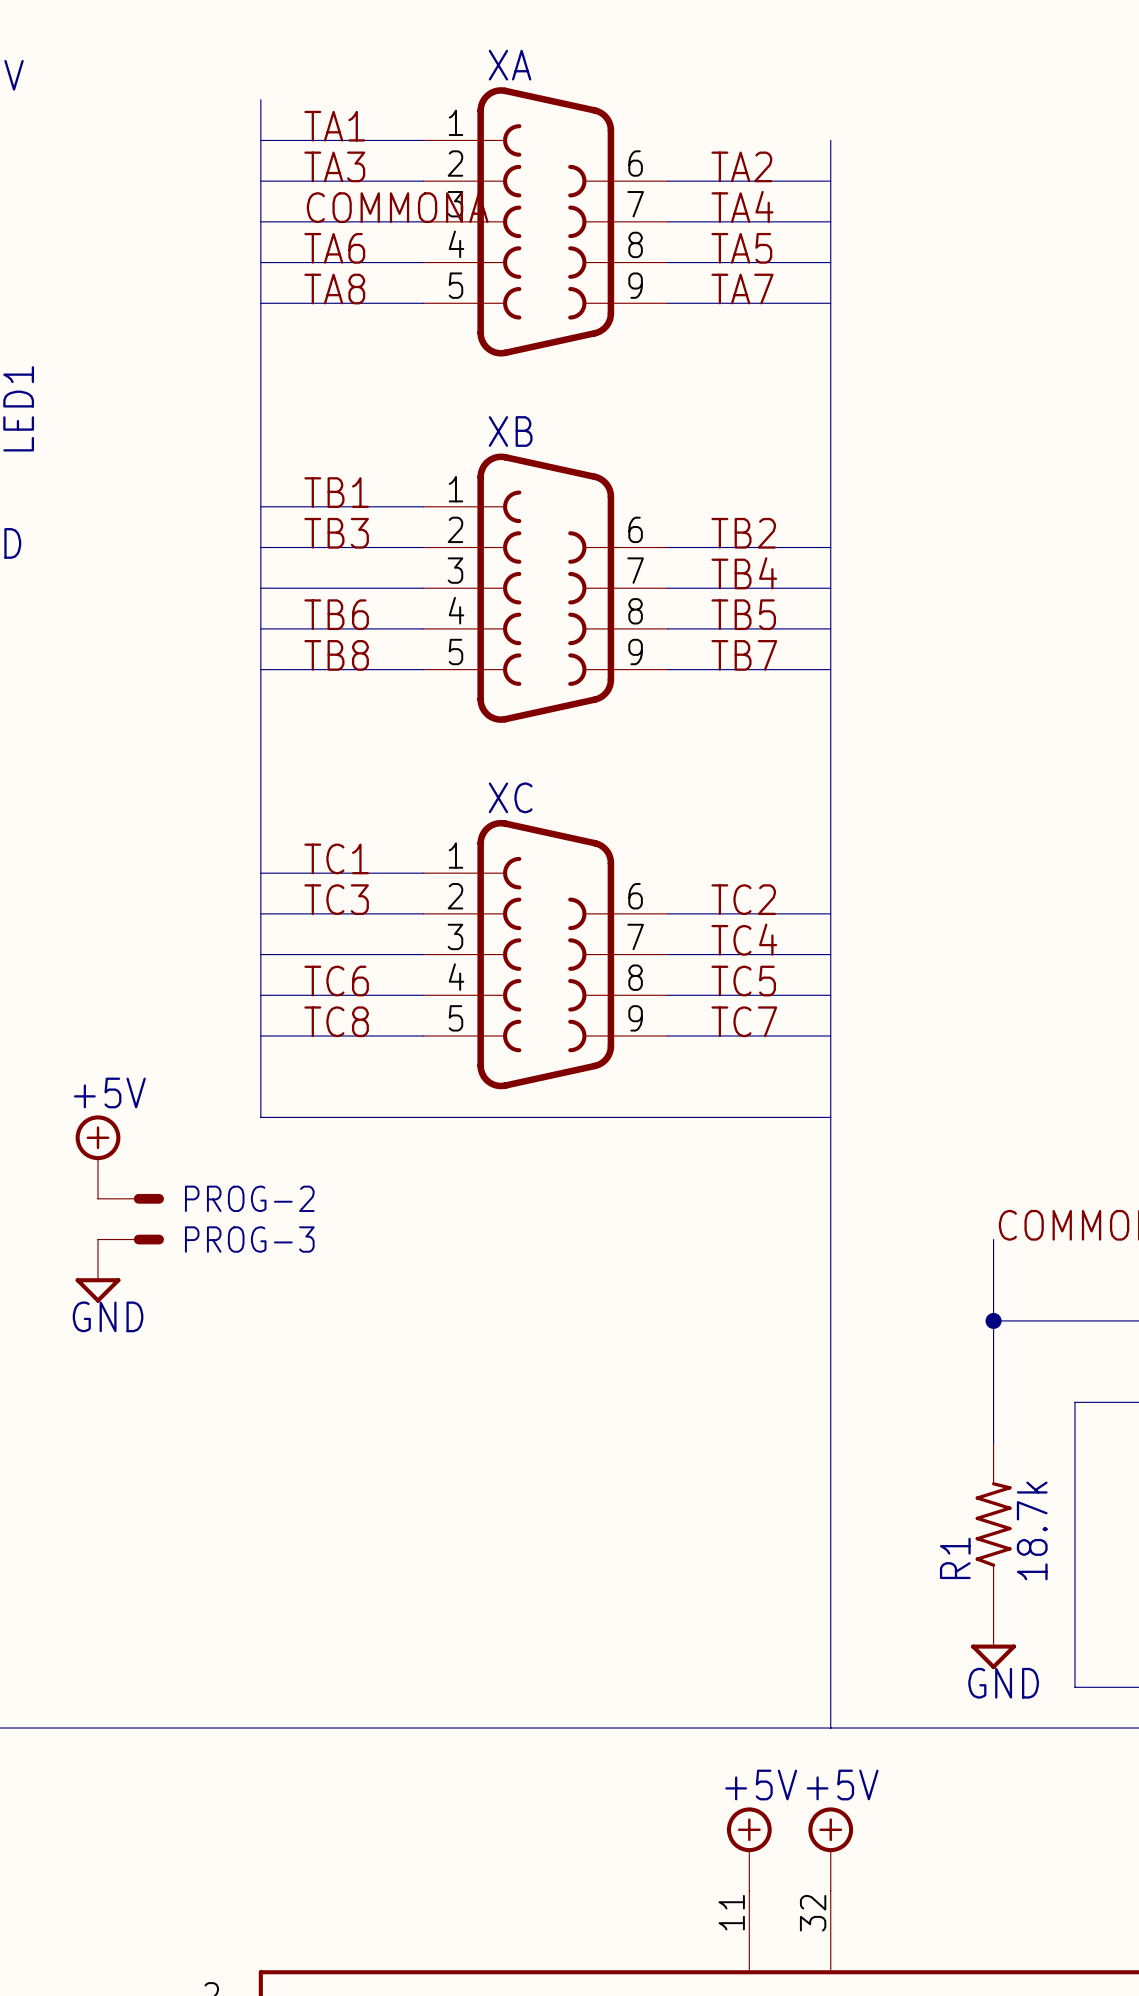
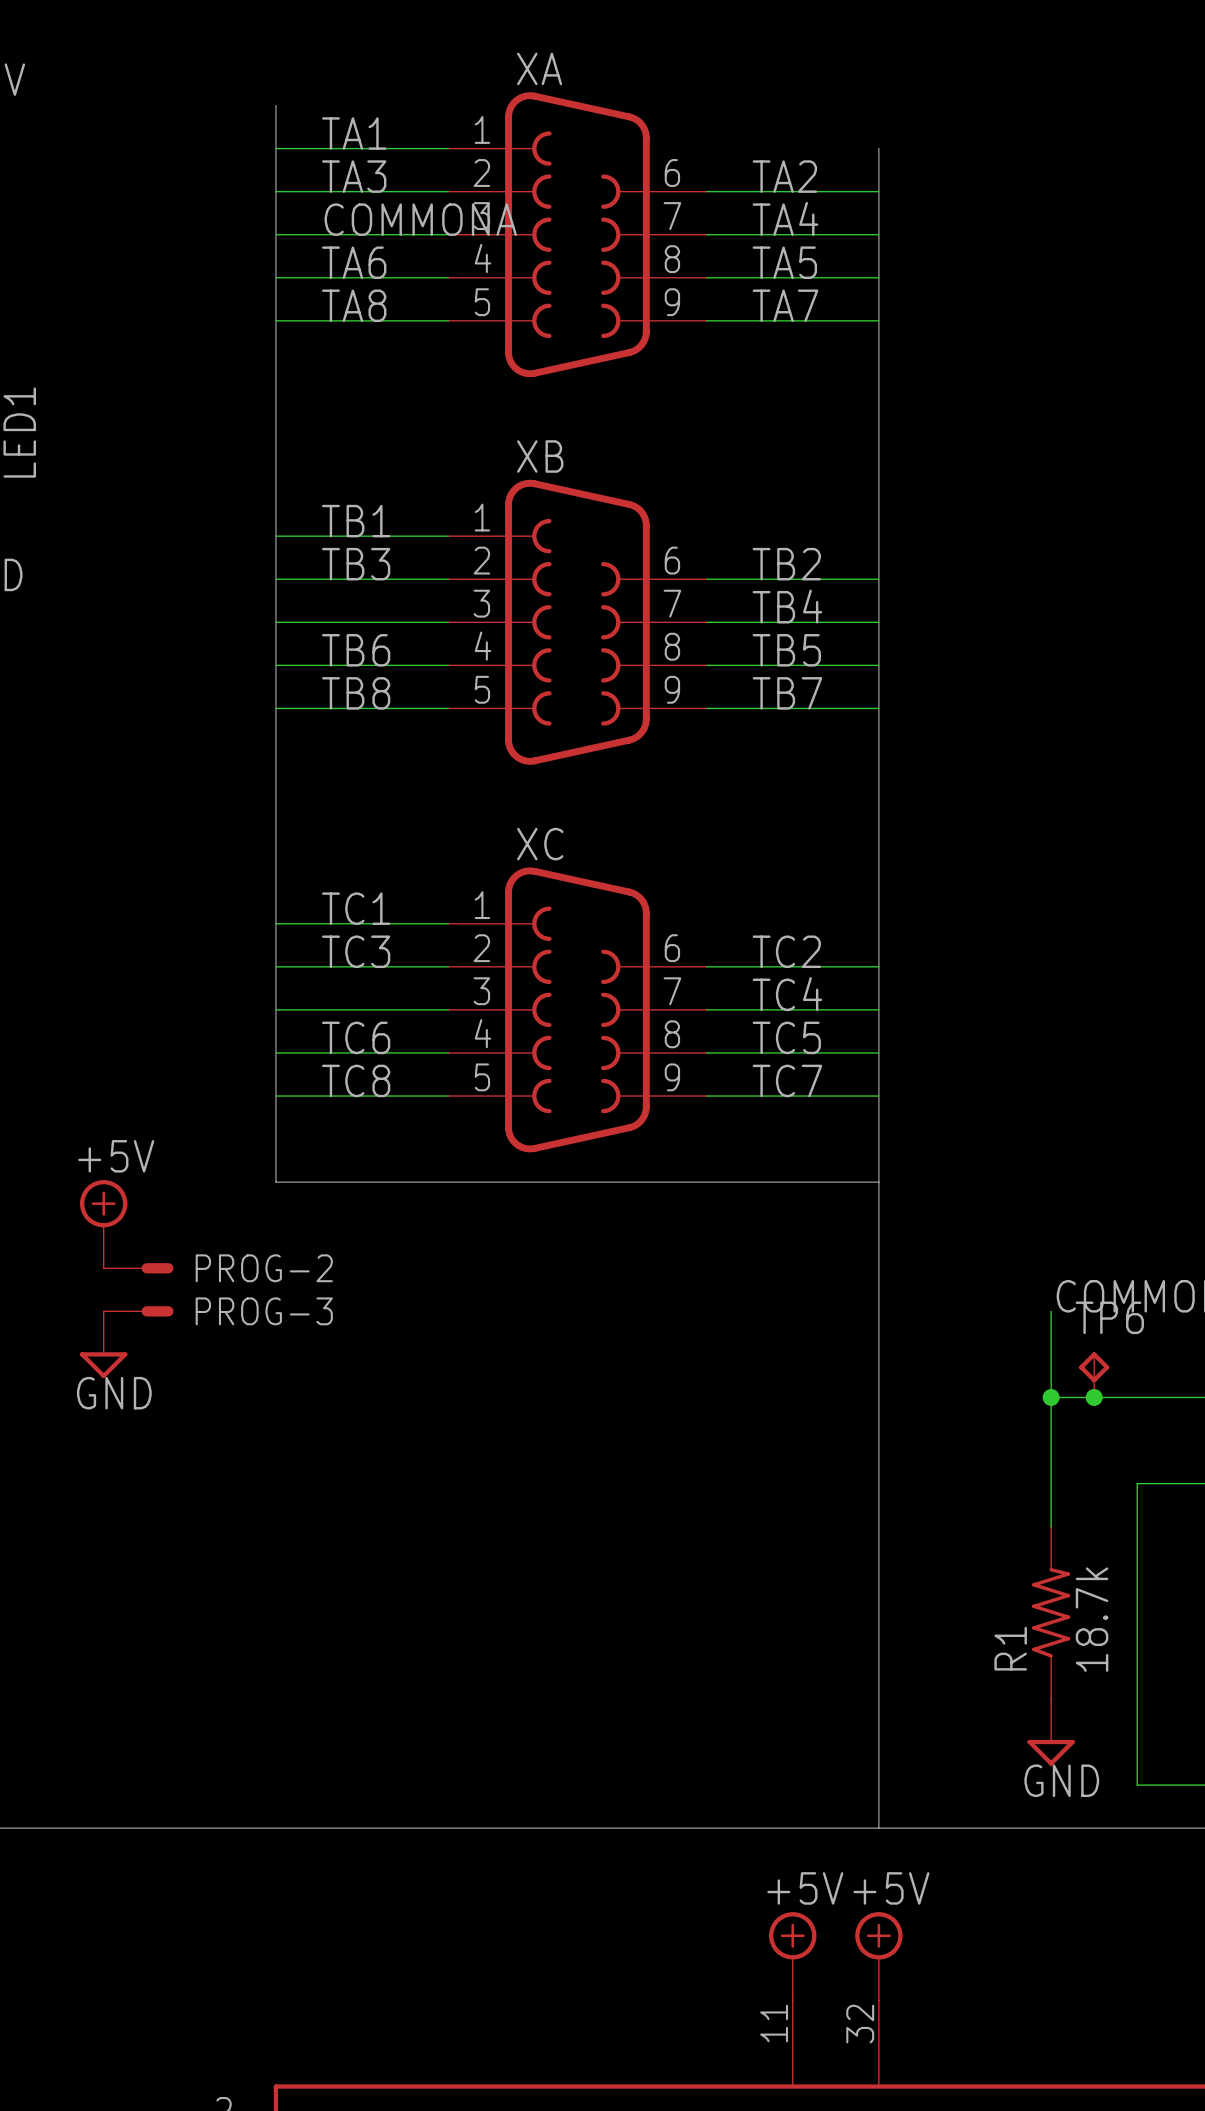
TP6: none -> (1094, 1374)
junction: none -> (1094, 1397)

